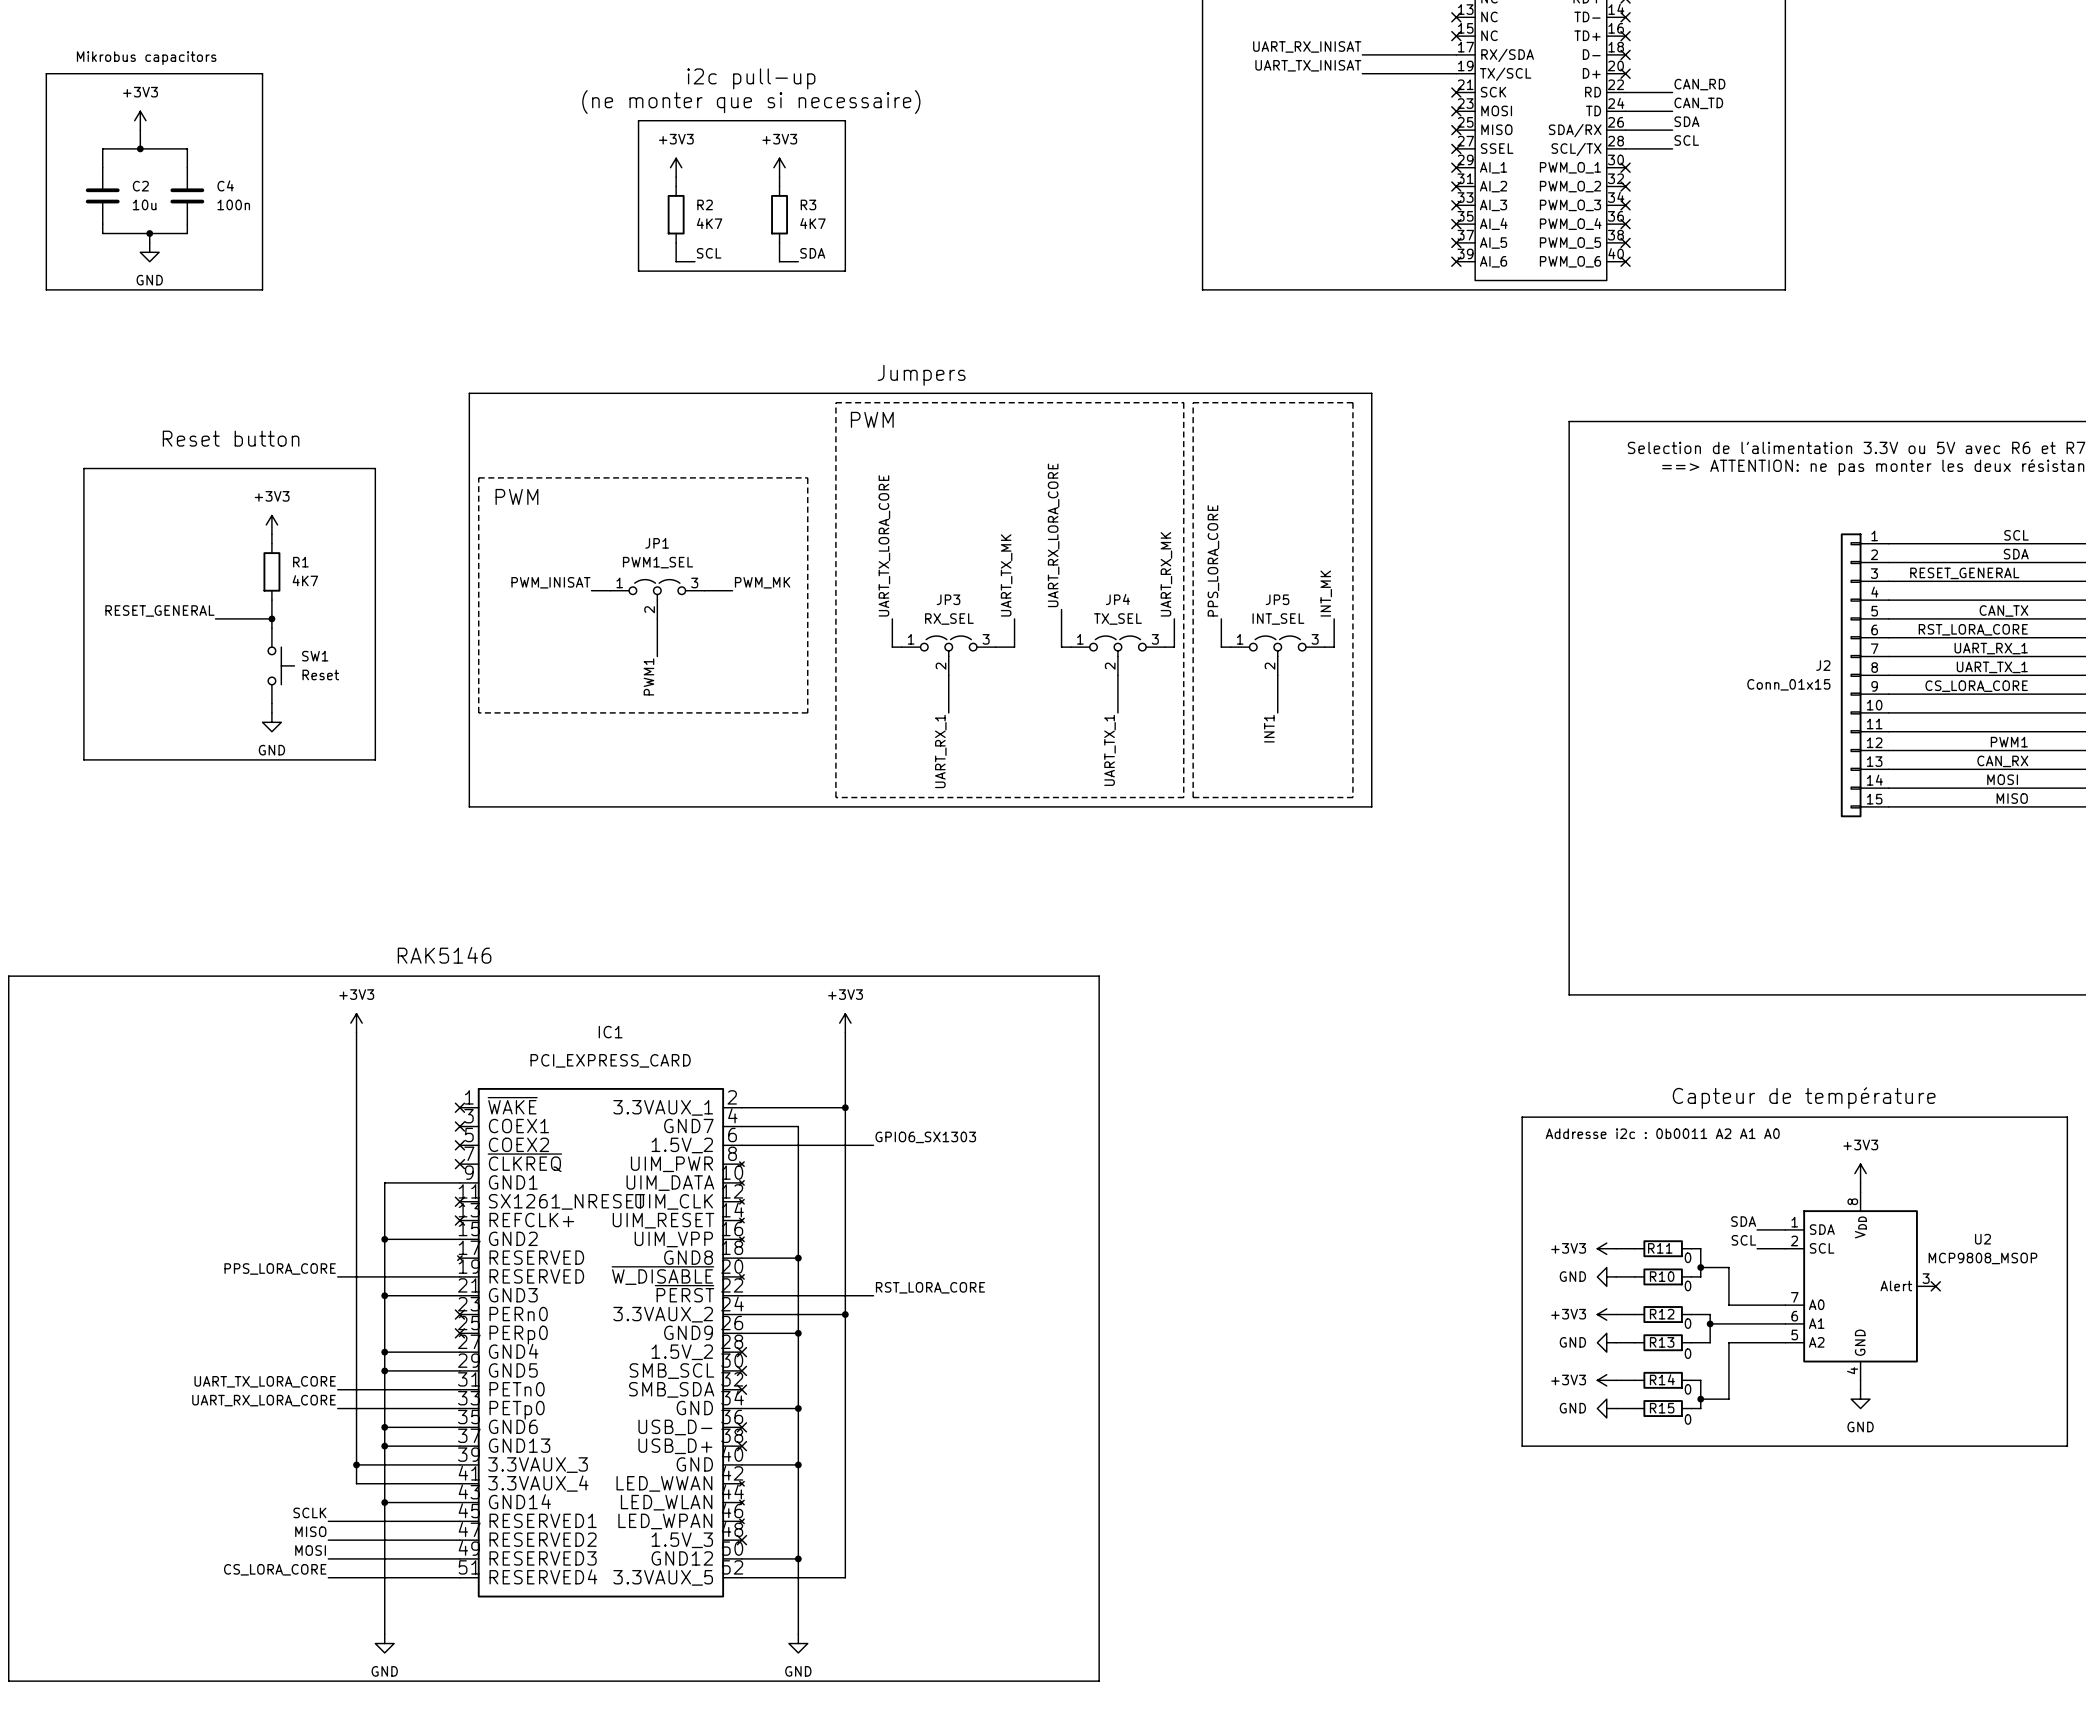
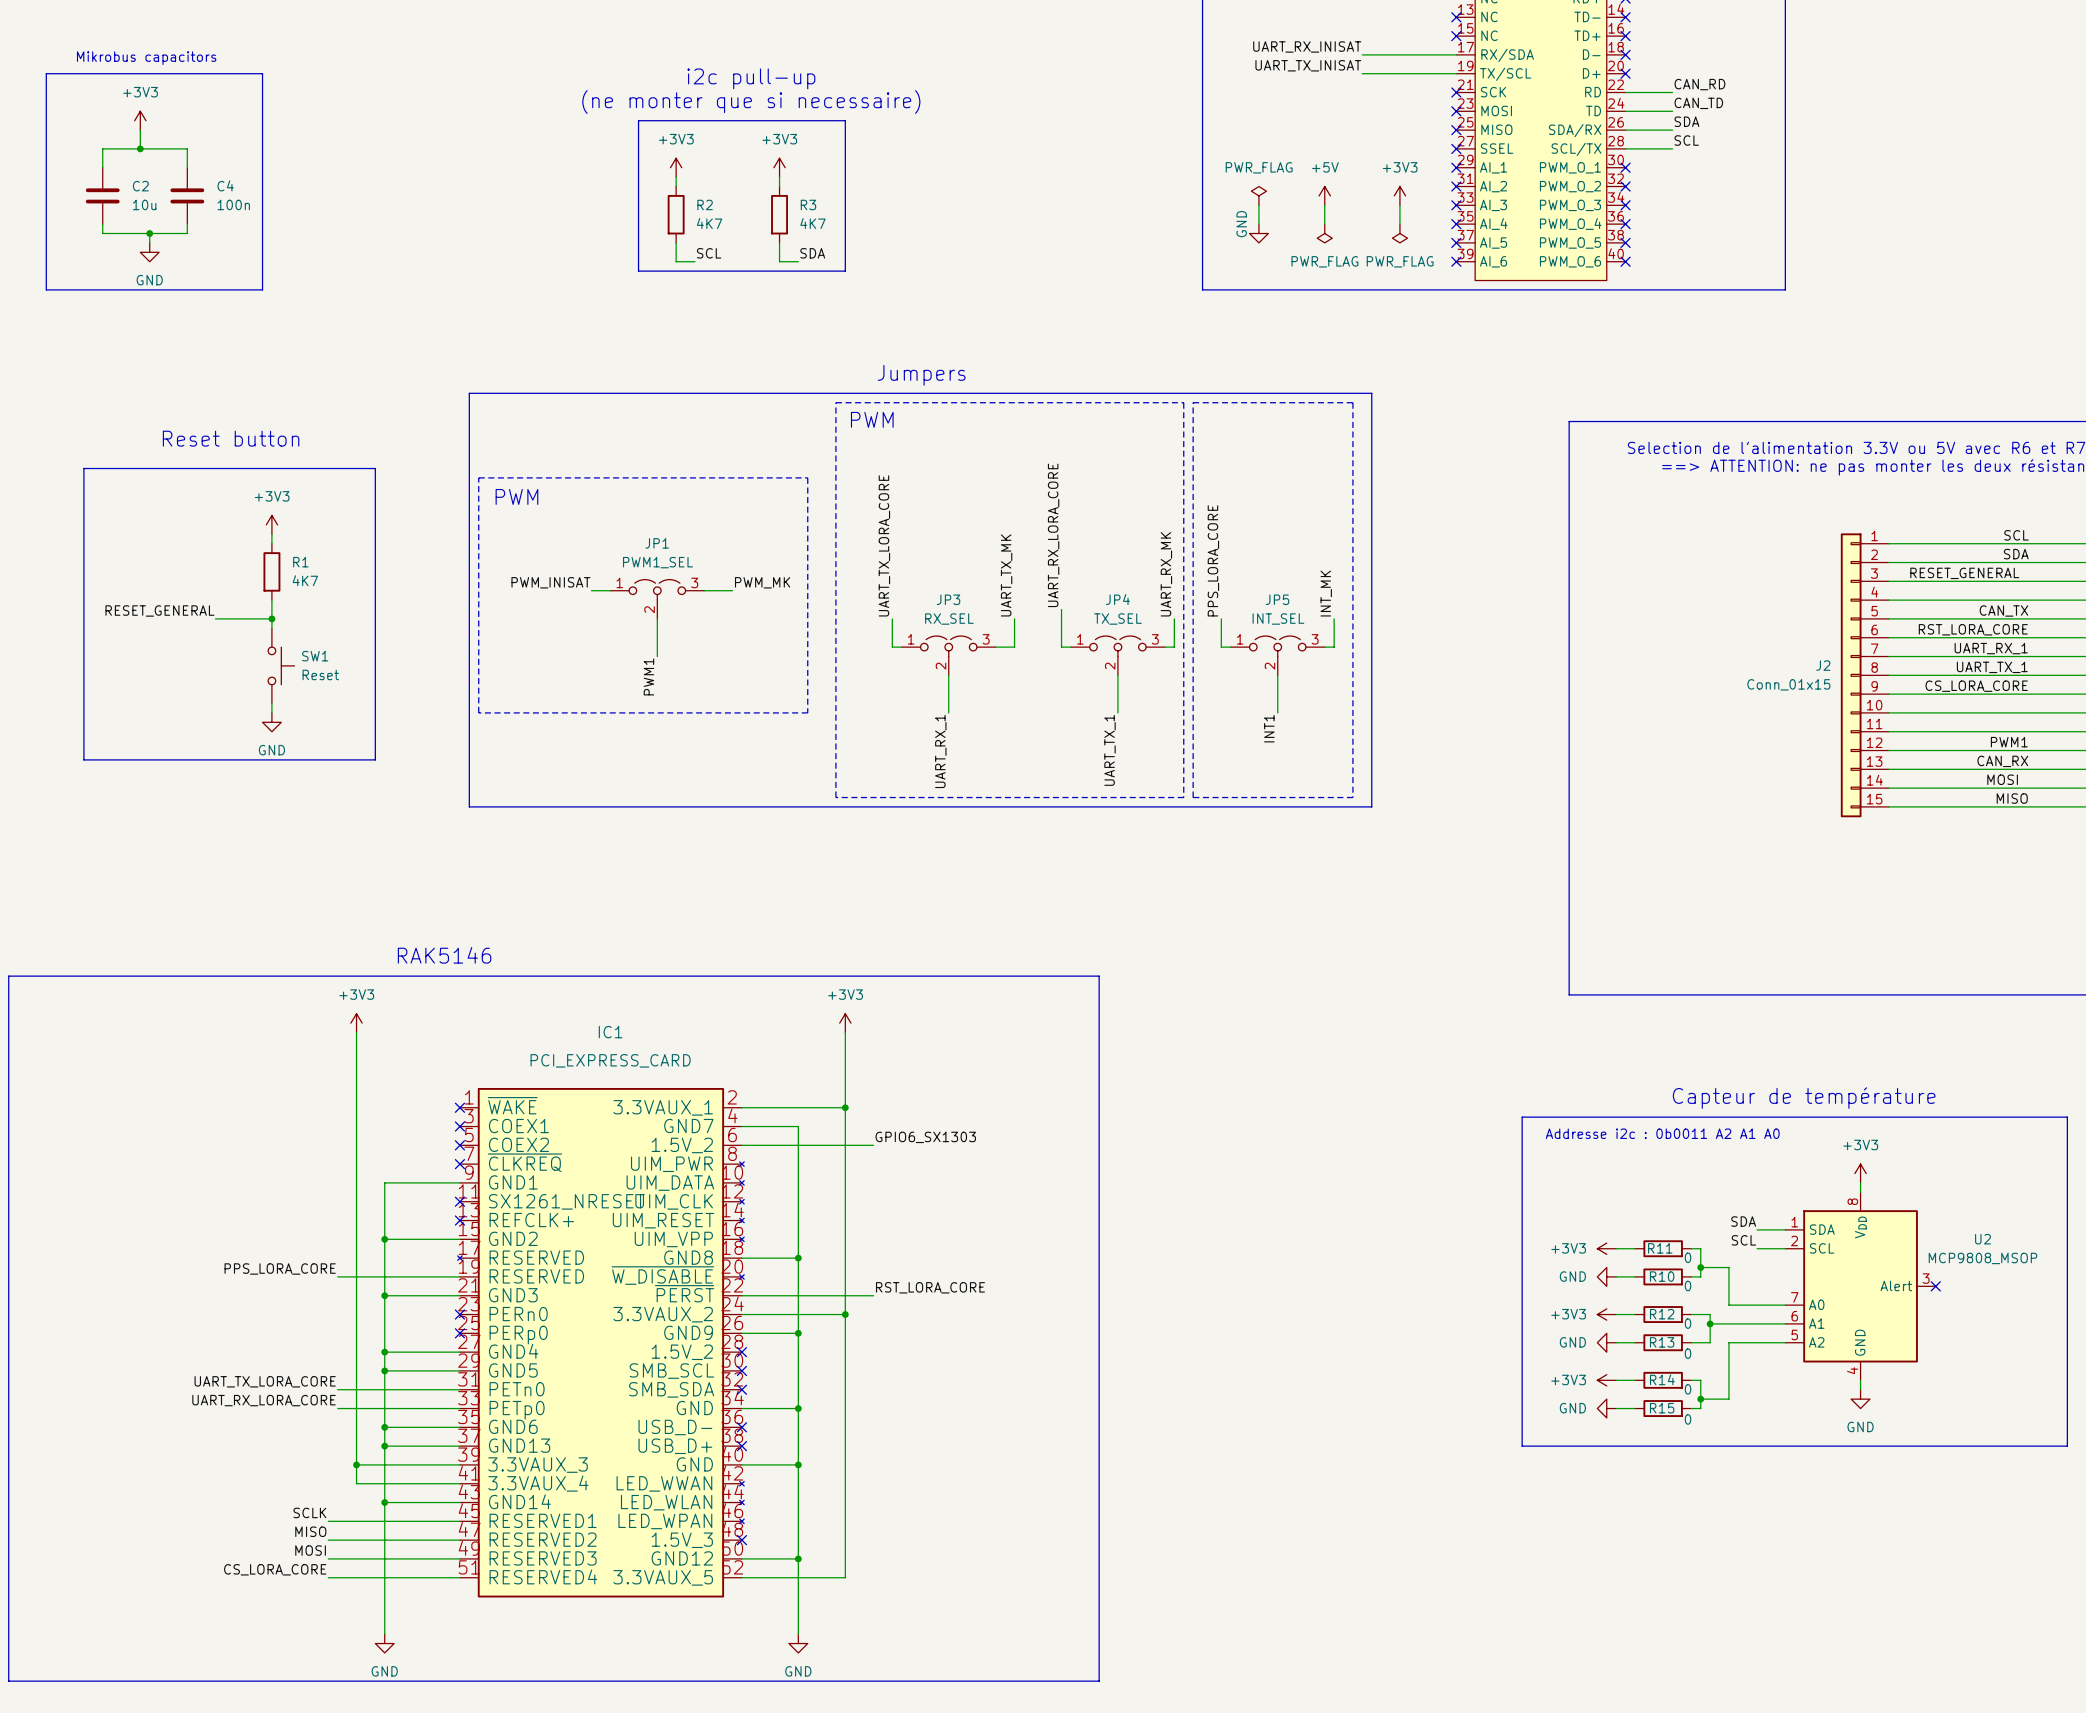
power symbol: none -> PWR_FLAG (1258, 195)
power symbol: none -> +5V (1324, 195)
power symbol: none -> +3V3 (1399, 195)
wire: none -> (1258, 205) (1258, 224)
wire: none -> (1324, 205) (1324, 224)
wire: none -> (1399, 205) (1399, 224)
power symbol: none -> GND (1258, 233)
power symbol: none -> PWR_FLAG (1324, 233)
power symbol: none -> PWR_FLAG (1399, 233)

